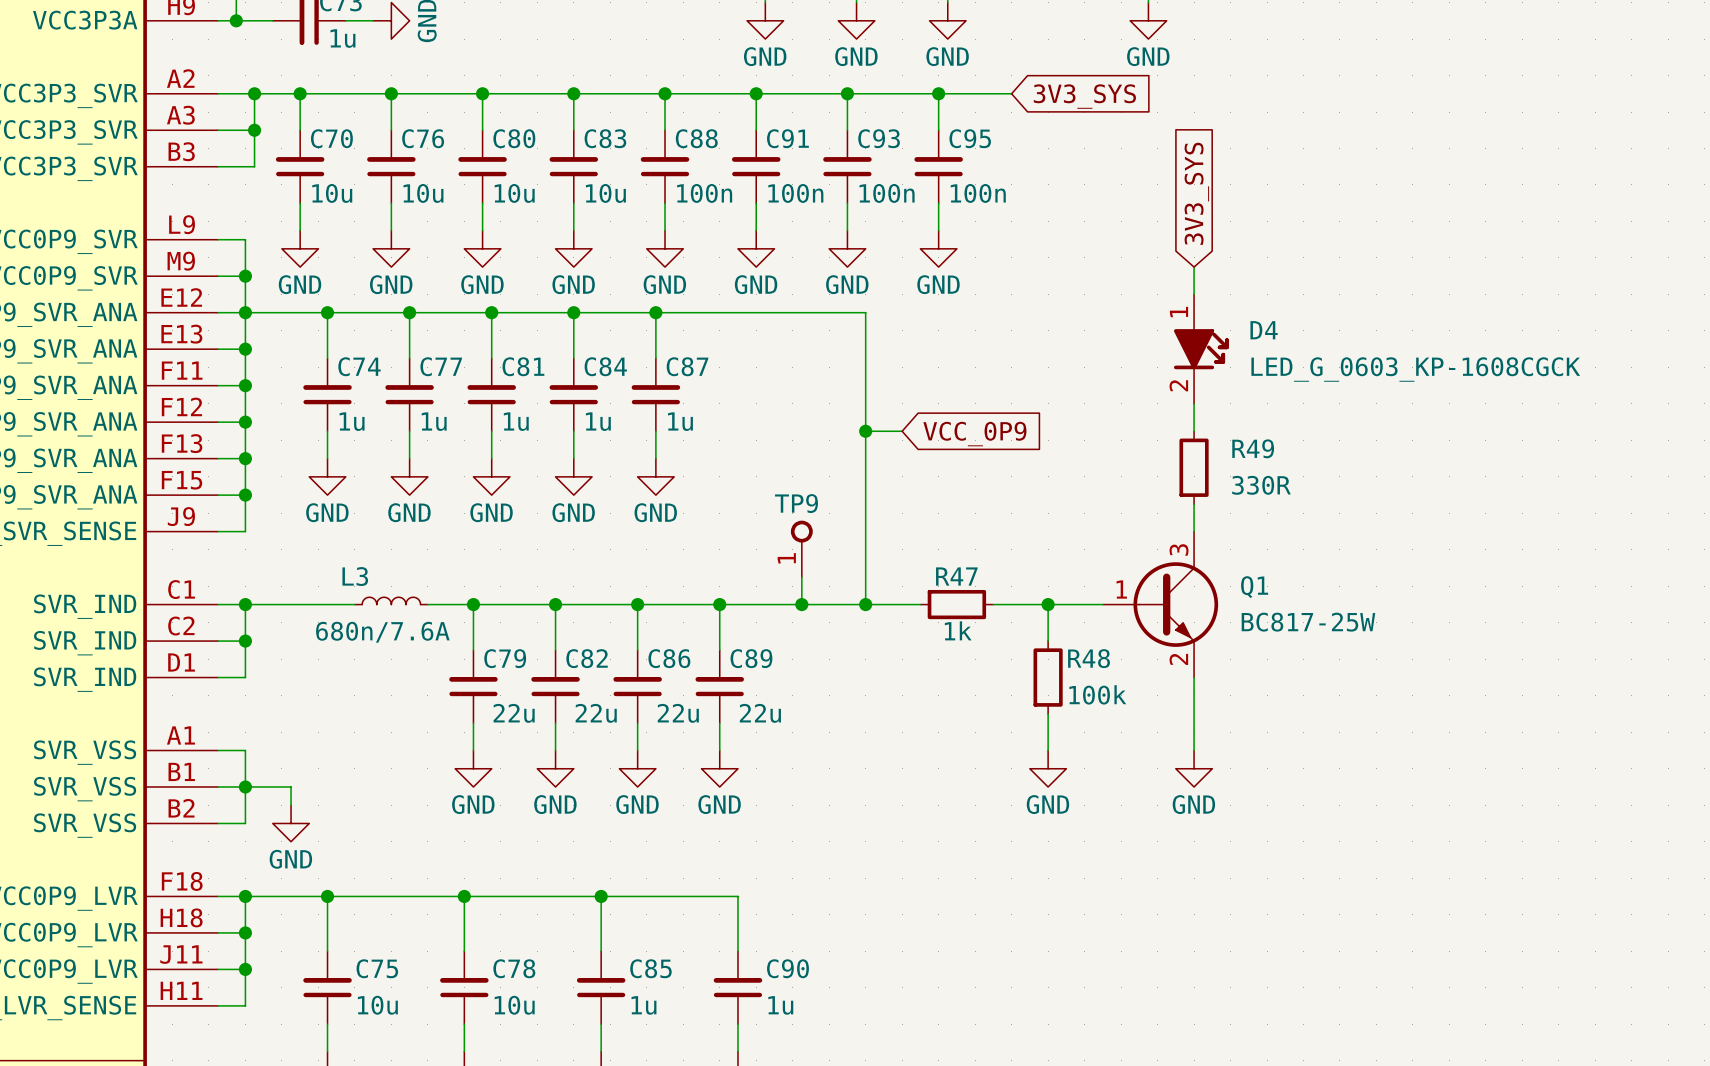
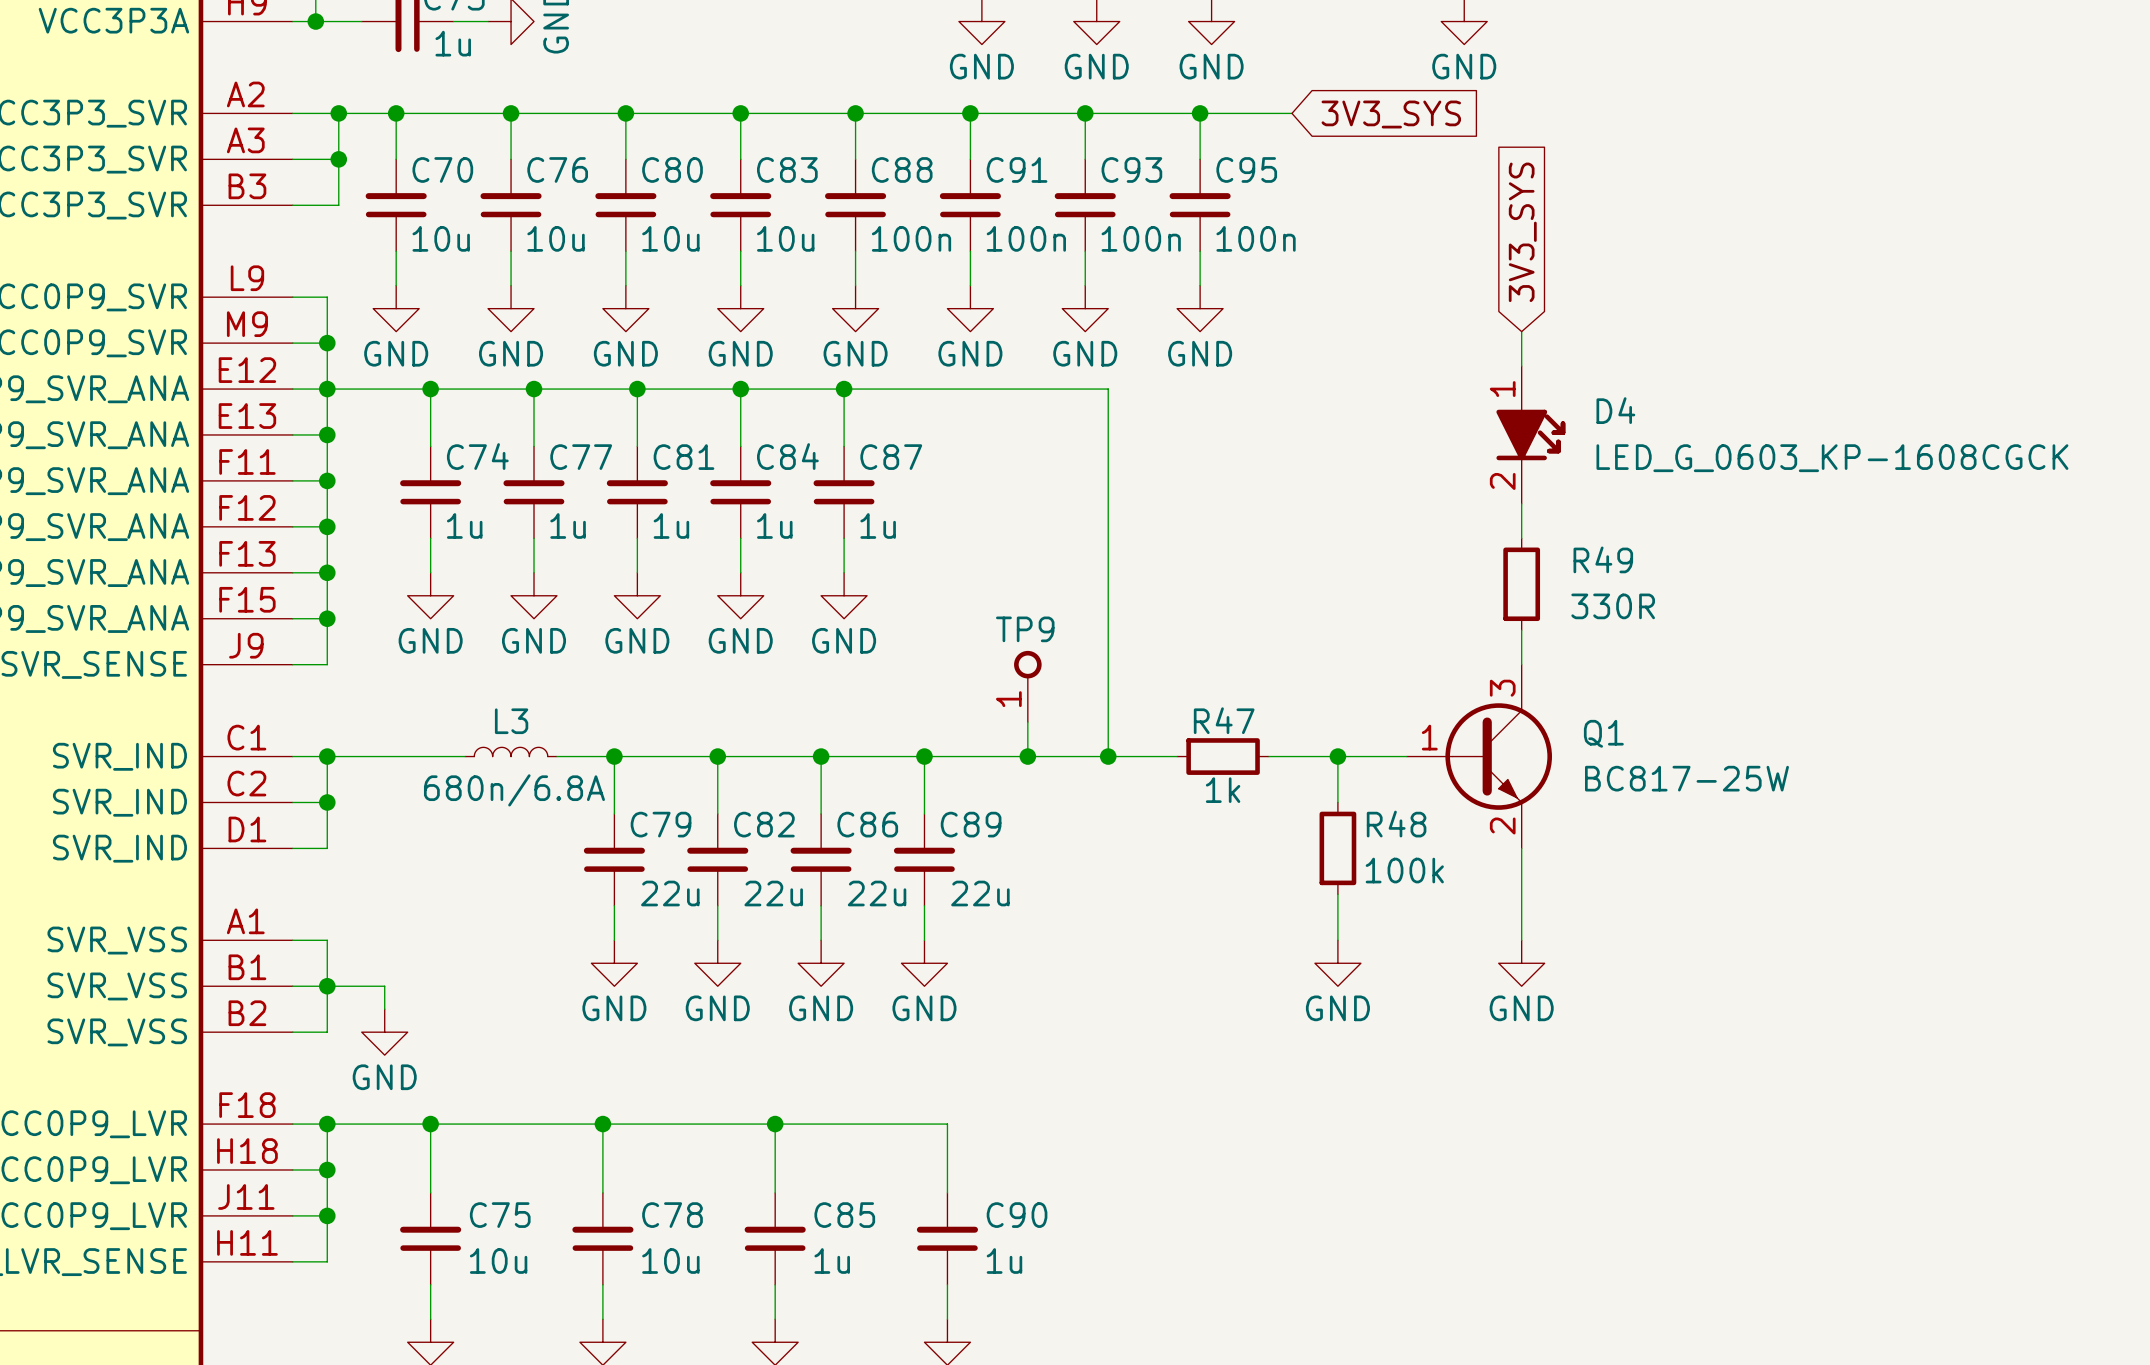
wire: (865, 431) (902, 431) -> none
junction: (865, 431) -> none
global label: VCC_0P9 (974, 434) -> none
L3 name position: L3 (355, 576) -> L3 (511, 721)
L3 text: 680n/7.6A (382, 632) -> 680n/6.8A (514, 790)

